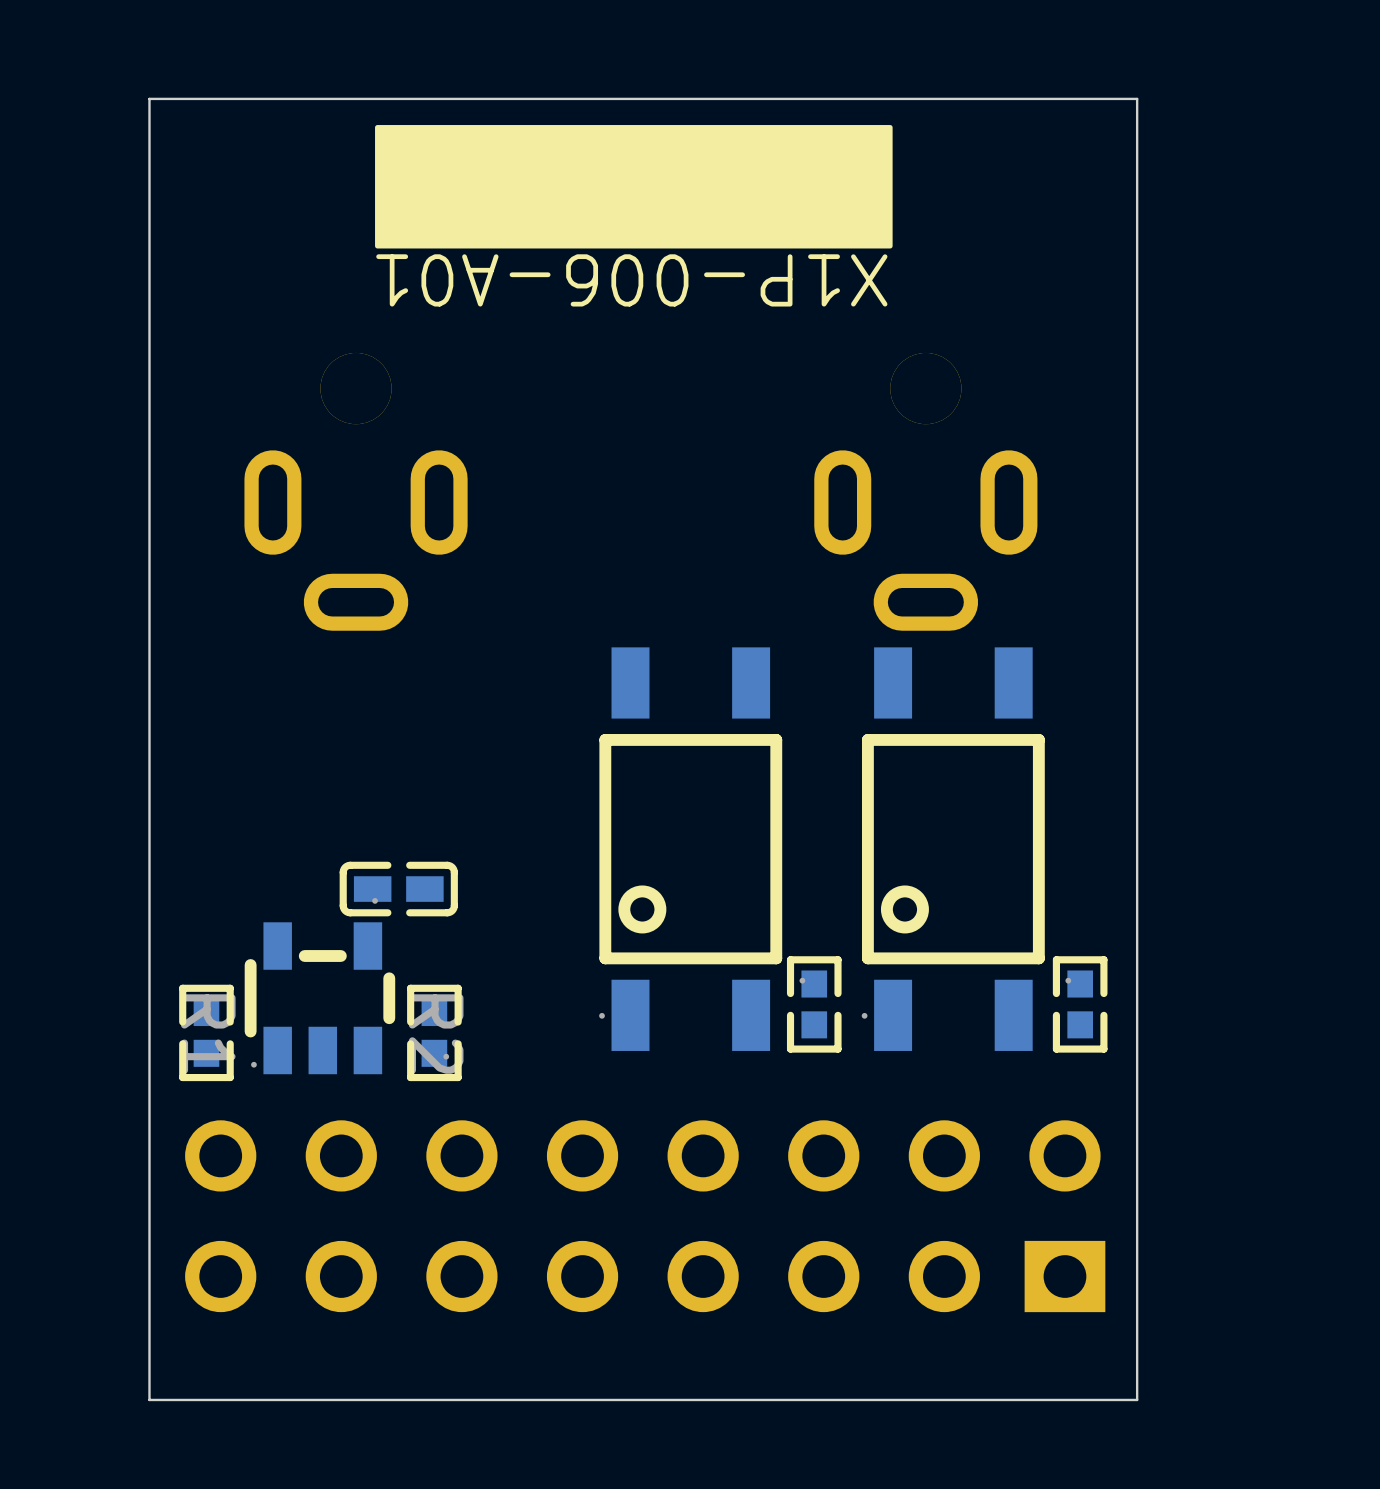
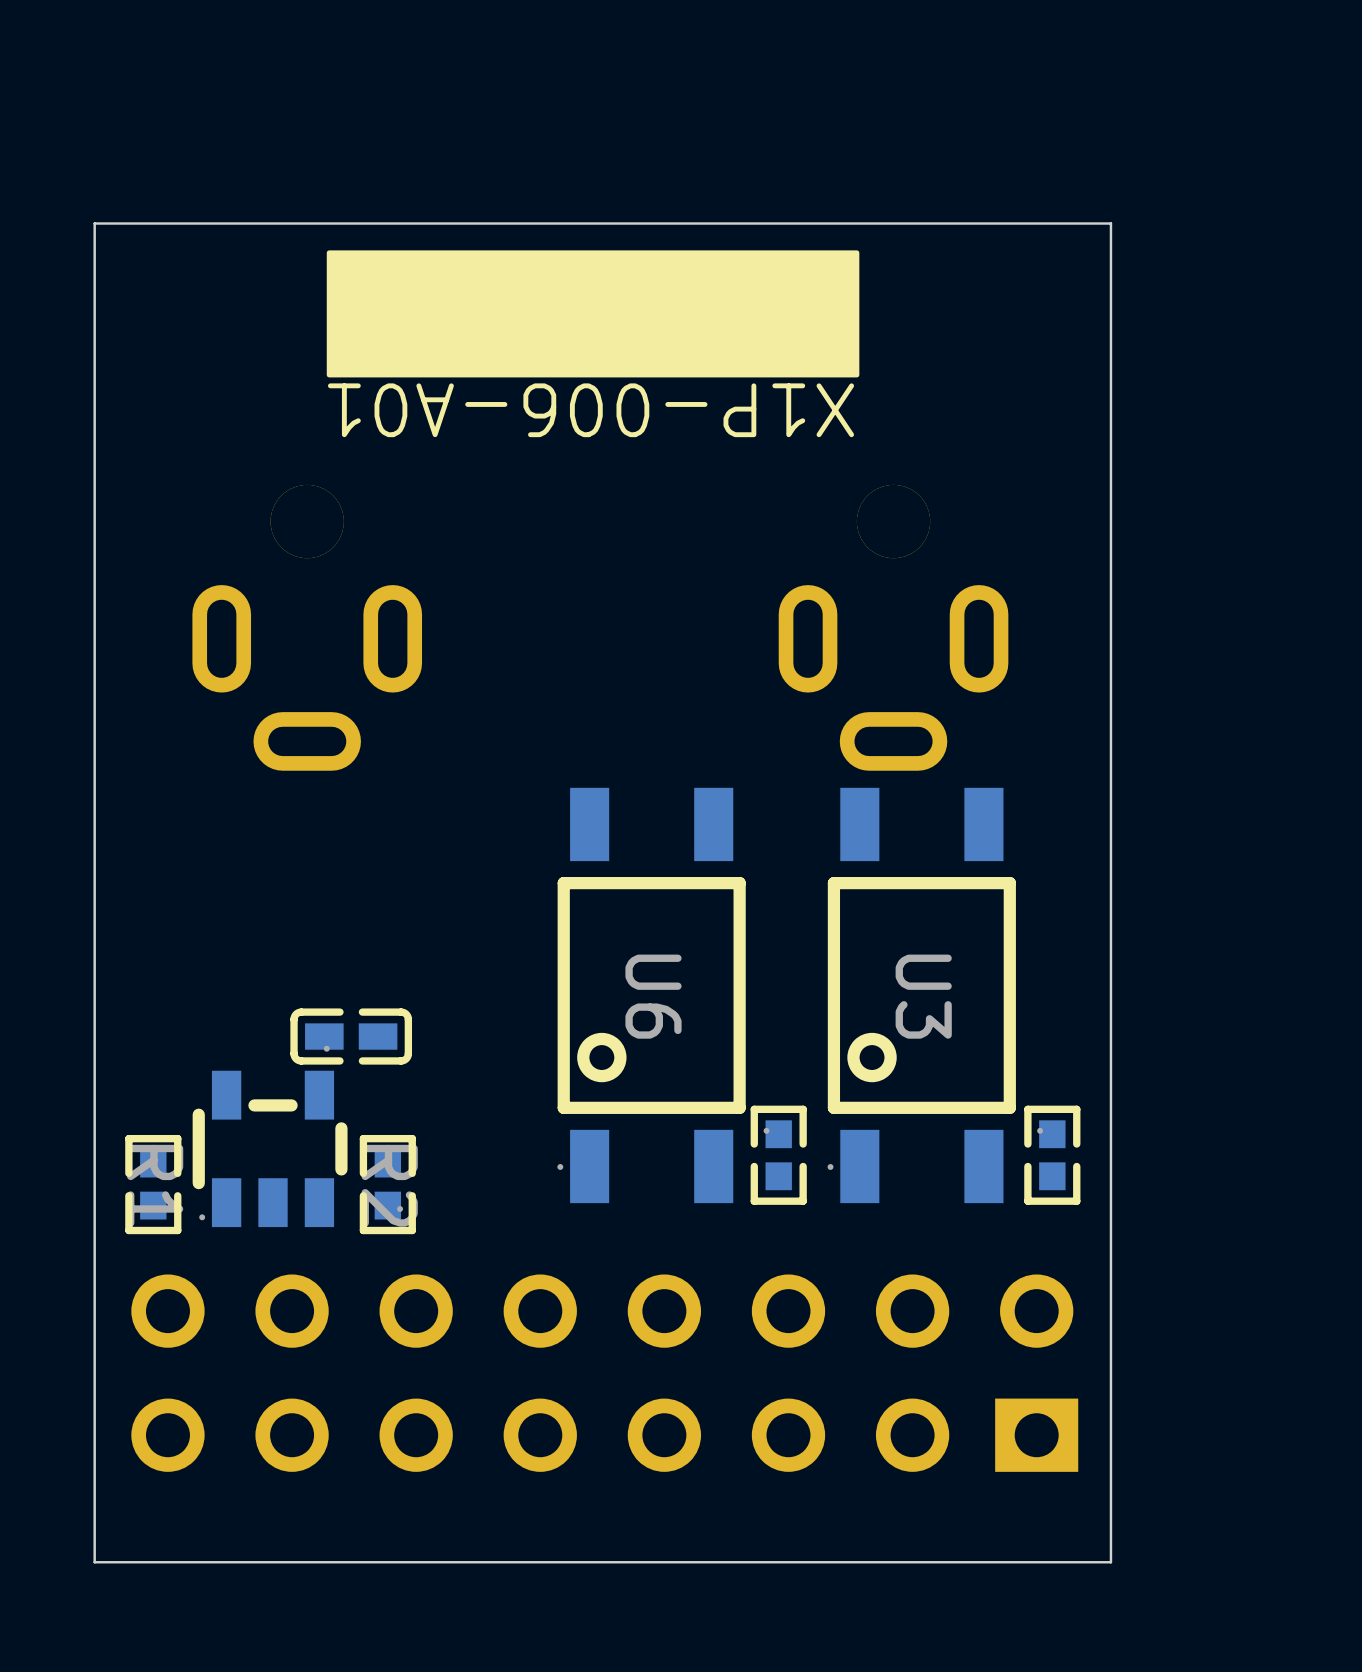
U6 name: none -> U6 (653, 996)
U3 name: none -> U3 (923, 996)

